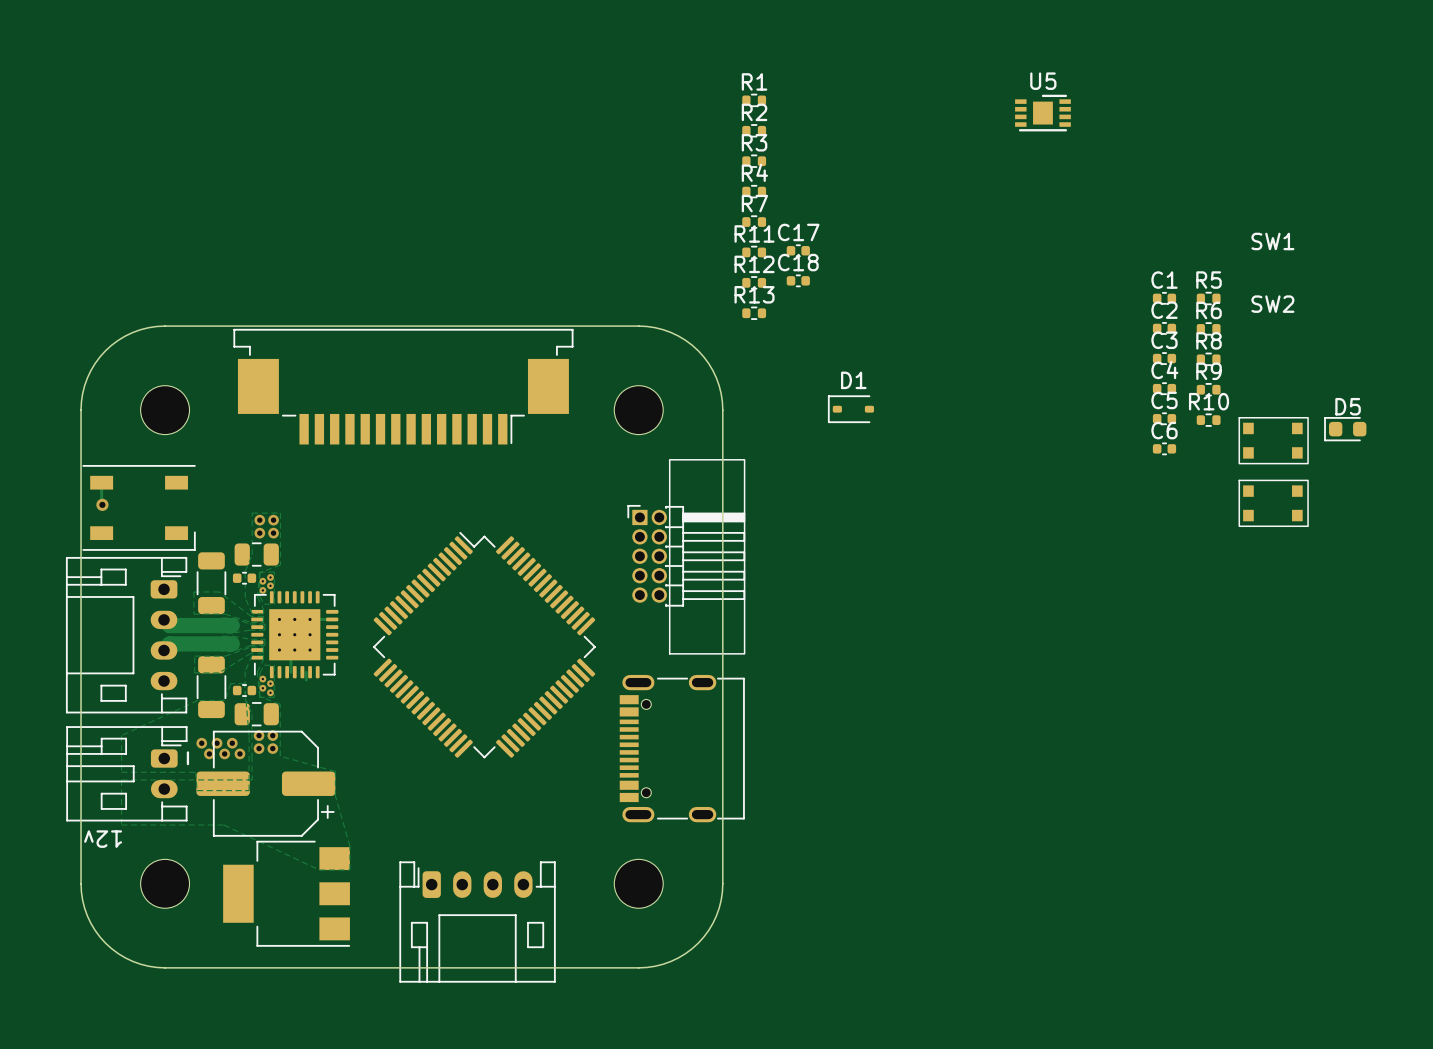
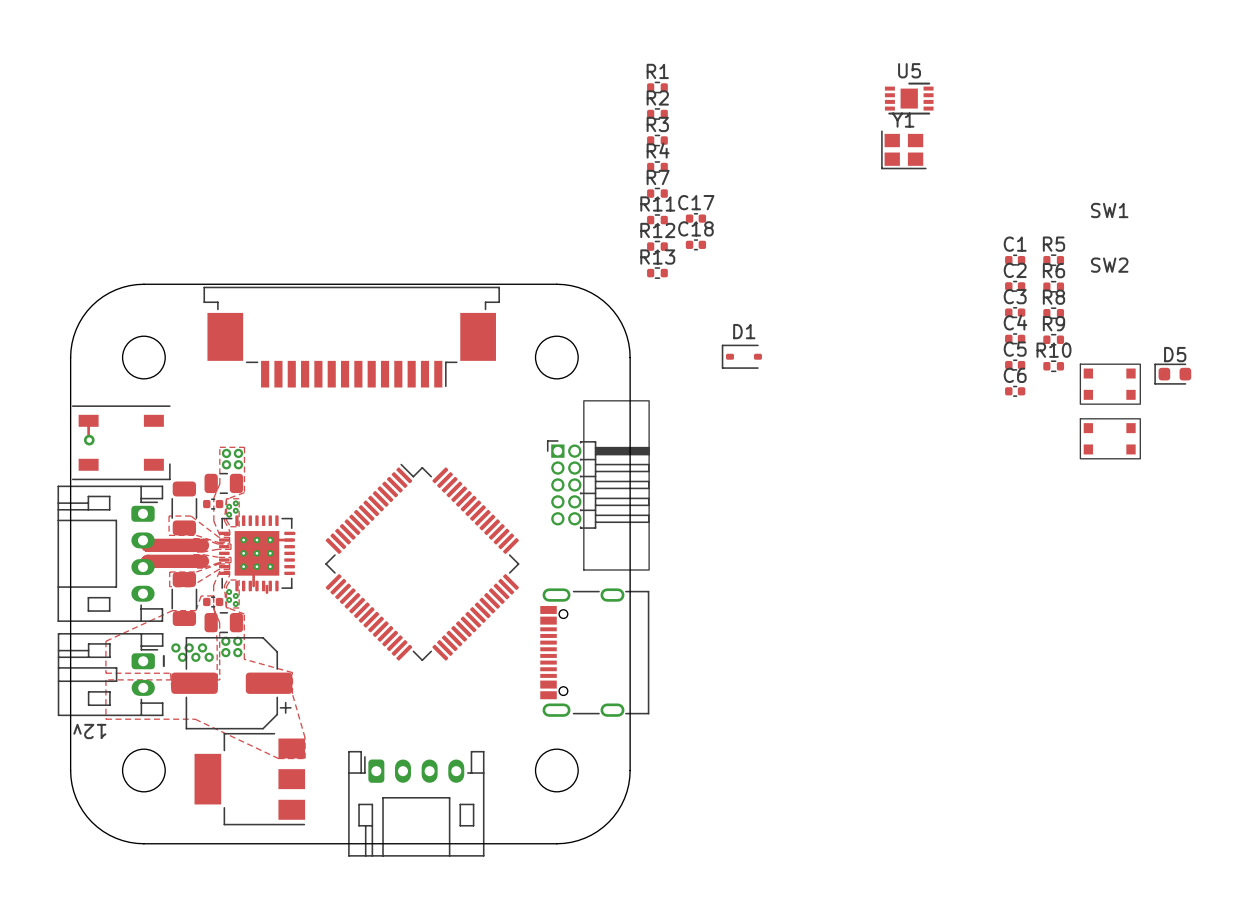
Y1: none -> (903, 149)

